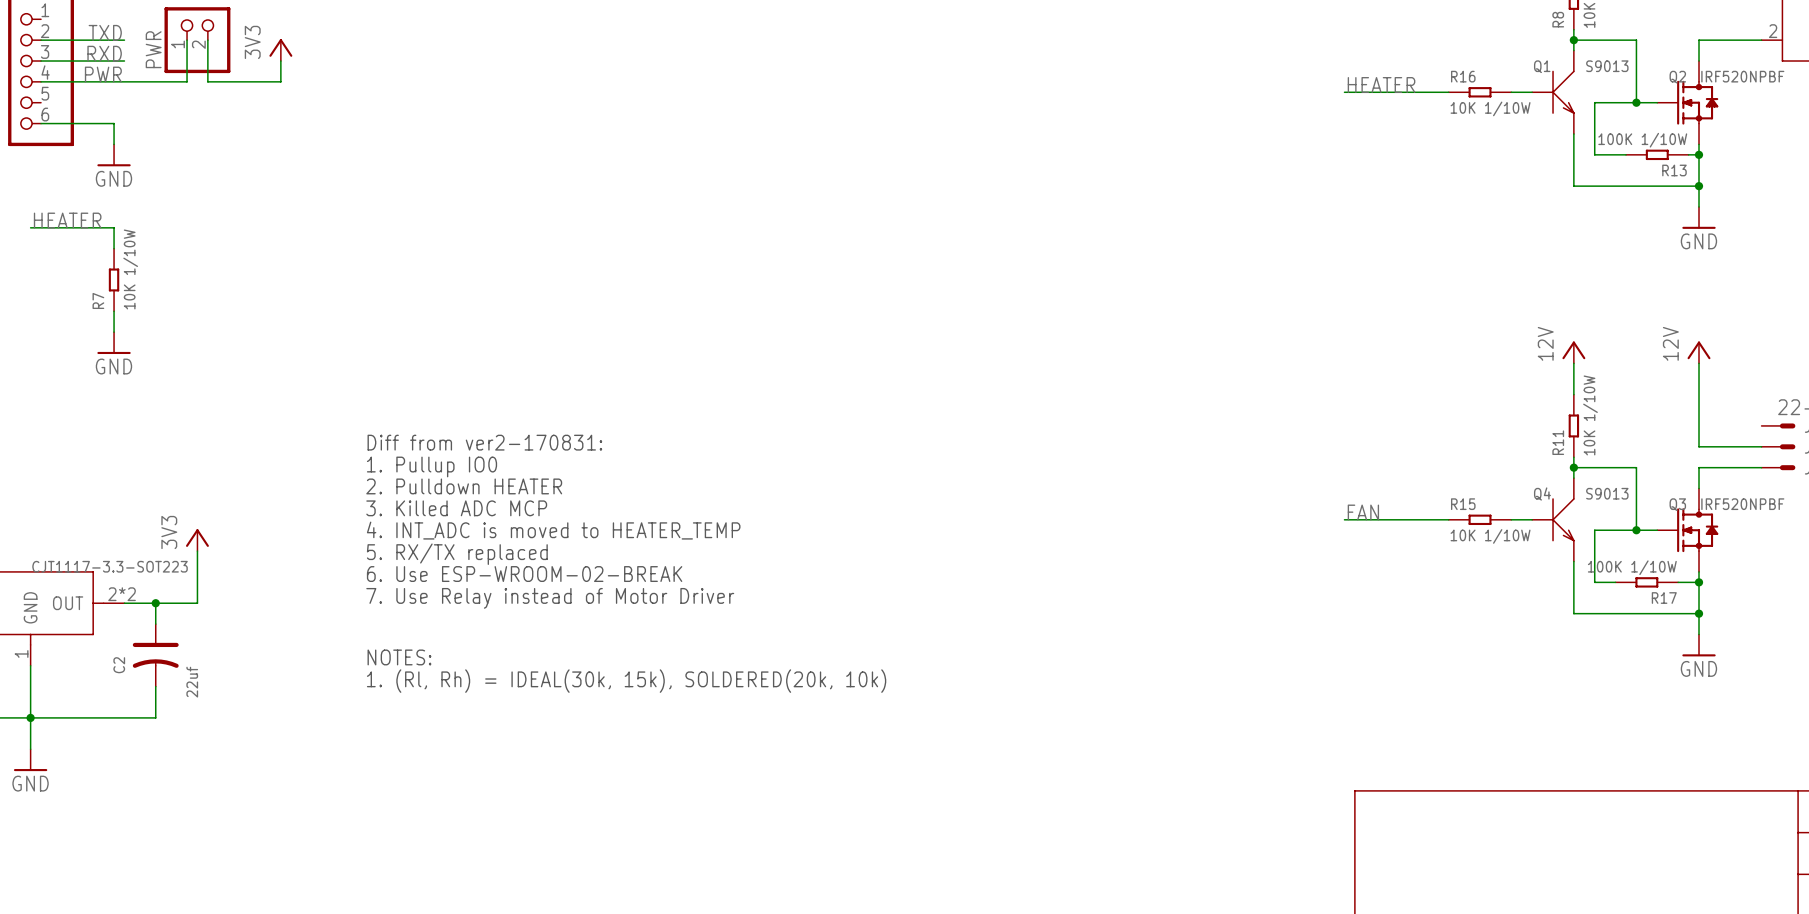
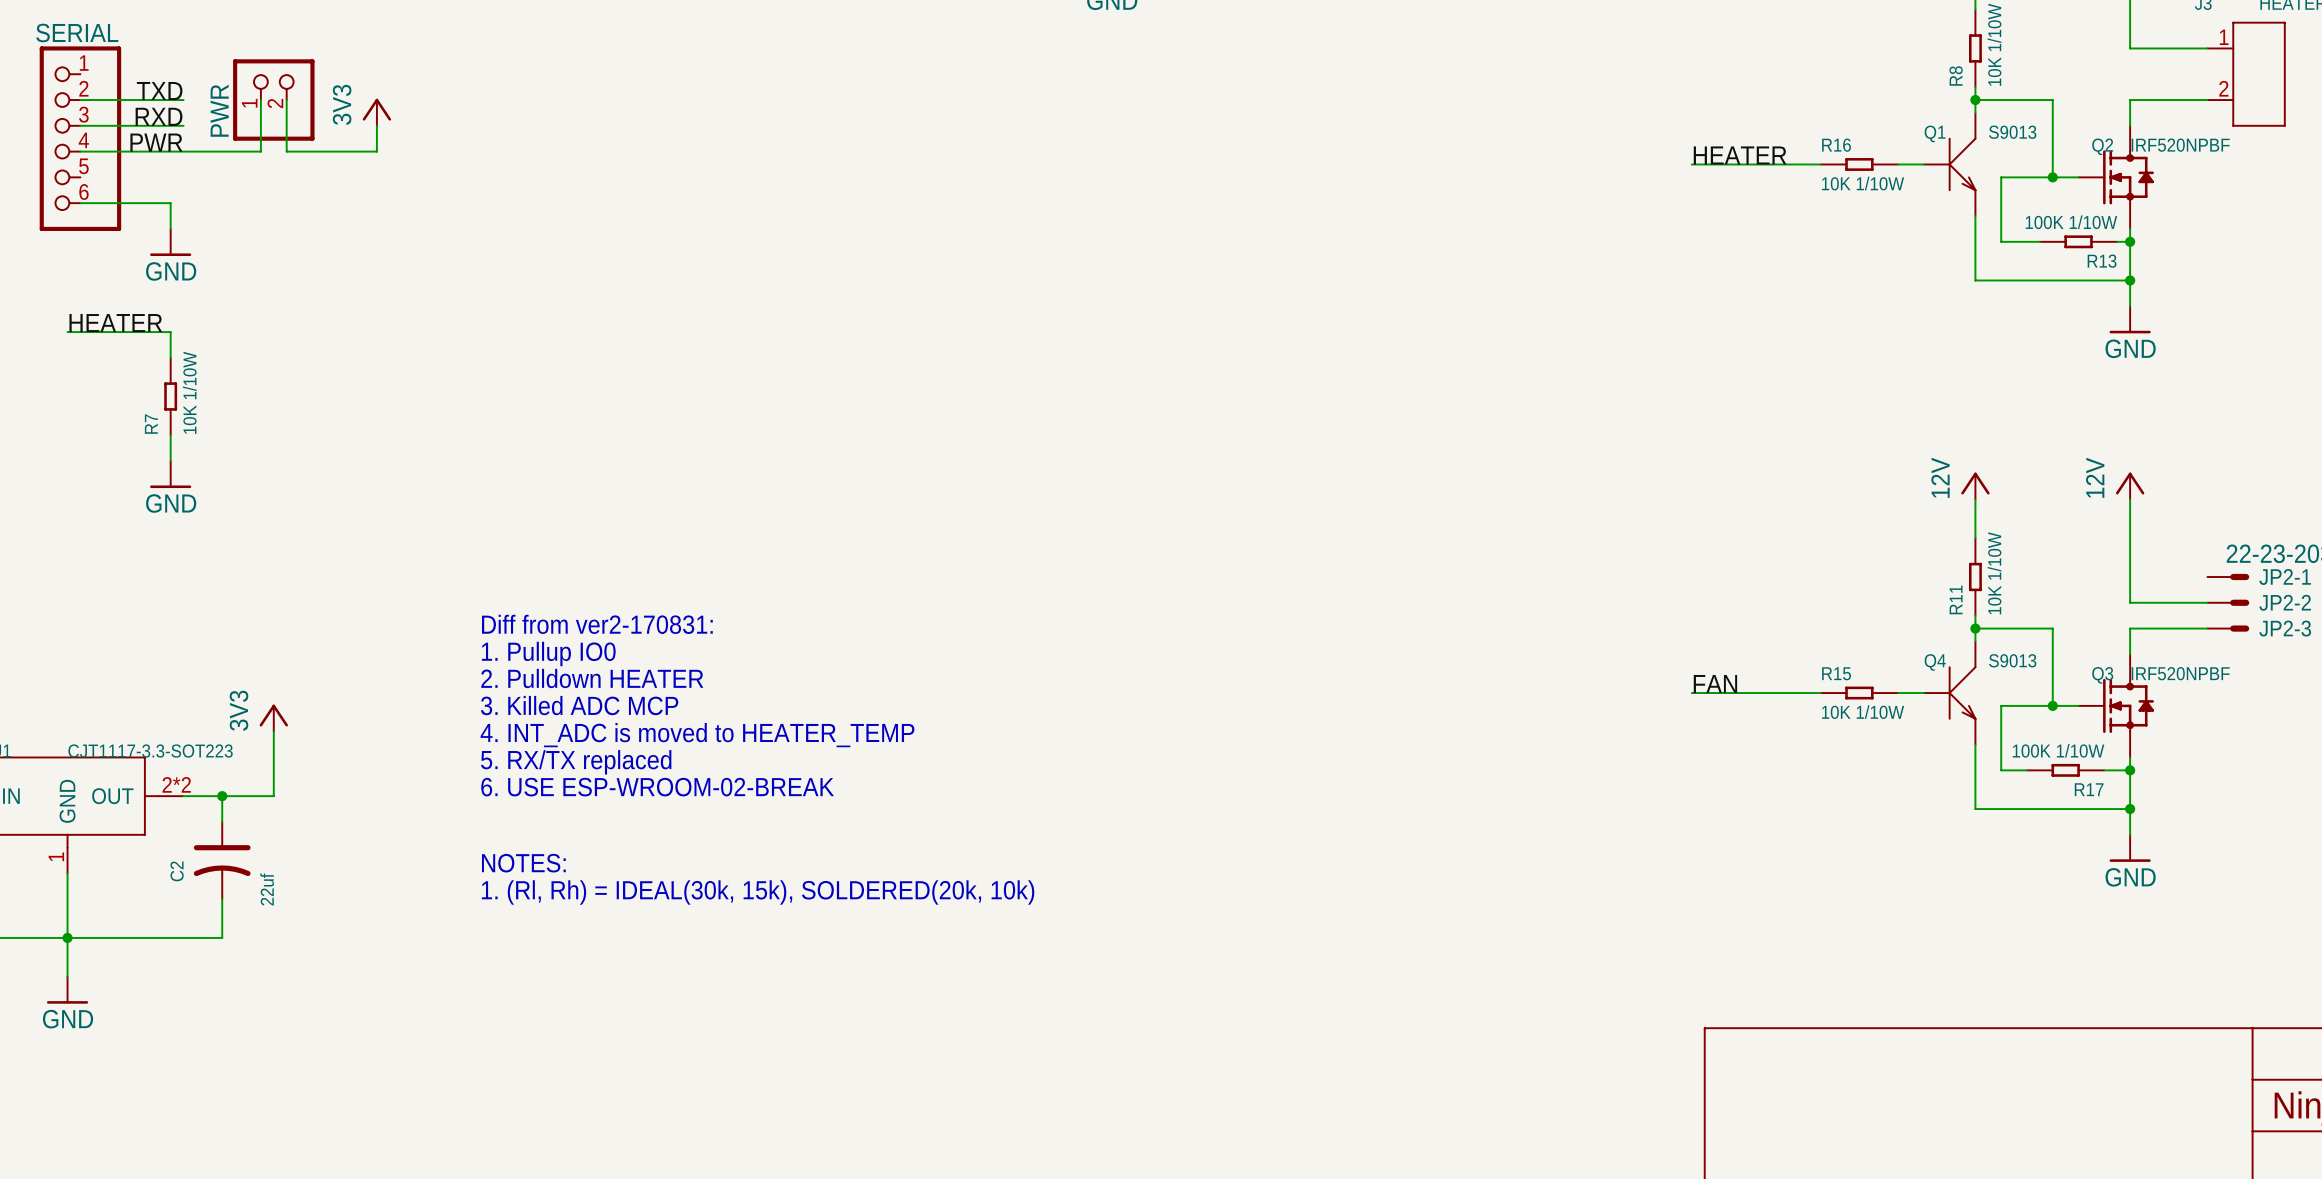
text: Diff from ver2-170831: (484, 442) -> none
text: 1. Pullup IO0 (432, 466) -> Diff from ver2-170831: (597, 624)
text: 2. Pulldown HEATER (464, 486) -> 1. Pullup IO0 (548, 654)
text: 3. Killed ADC MCP (456, 508) -> 2. Pulldown HEATER (592, 678)
text: 4. INT_ADC is moved to HEATER_TEMP (553, 530) -> 3. Killed ADC MCP (579, 705)
text: 5. RX/TX replaced (457, 554) -> 4. INT_ADC is moved to HEATER_TEMP (697, 735)
text: 6. Use ESP-WROOM-02-BREAK (524, 574) -> 5. RX/TX replaced (576, 762)
text: 7. Use Relay instead of Motor Driver (550, 598) -> 6. USE ESP-WROOM-02-BREAK (657, 787)

